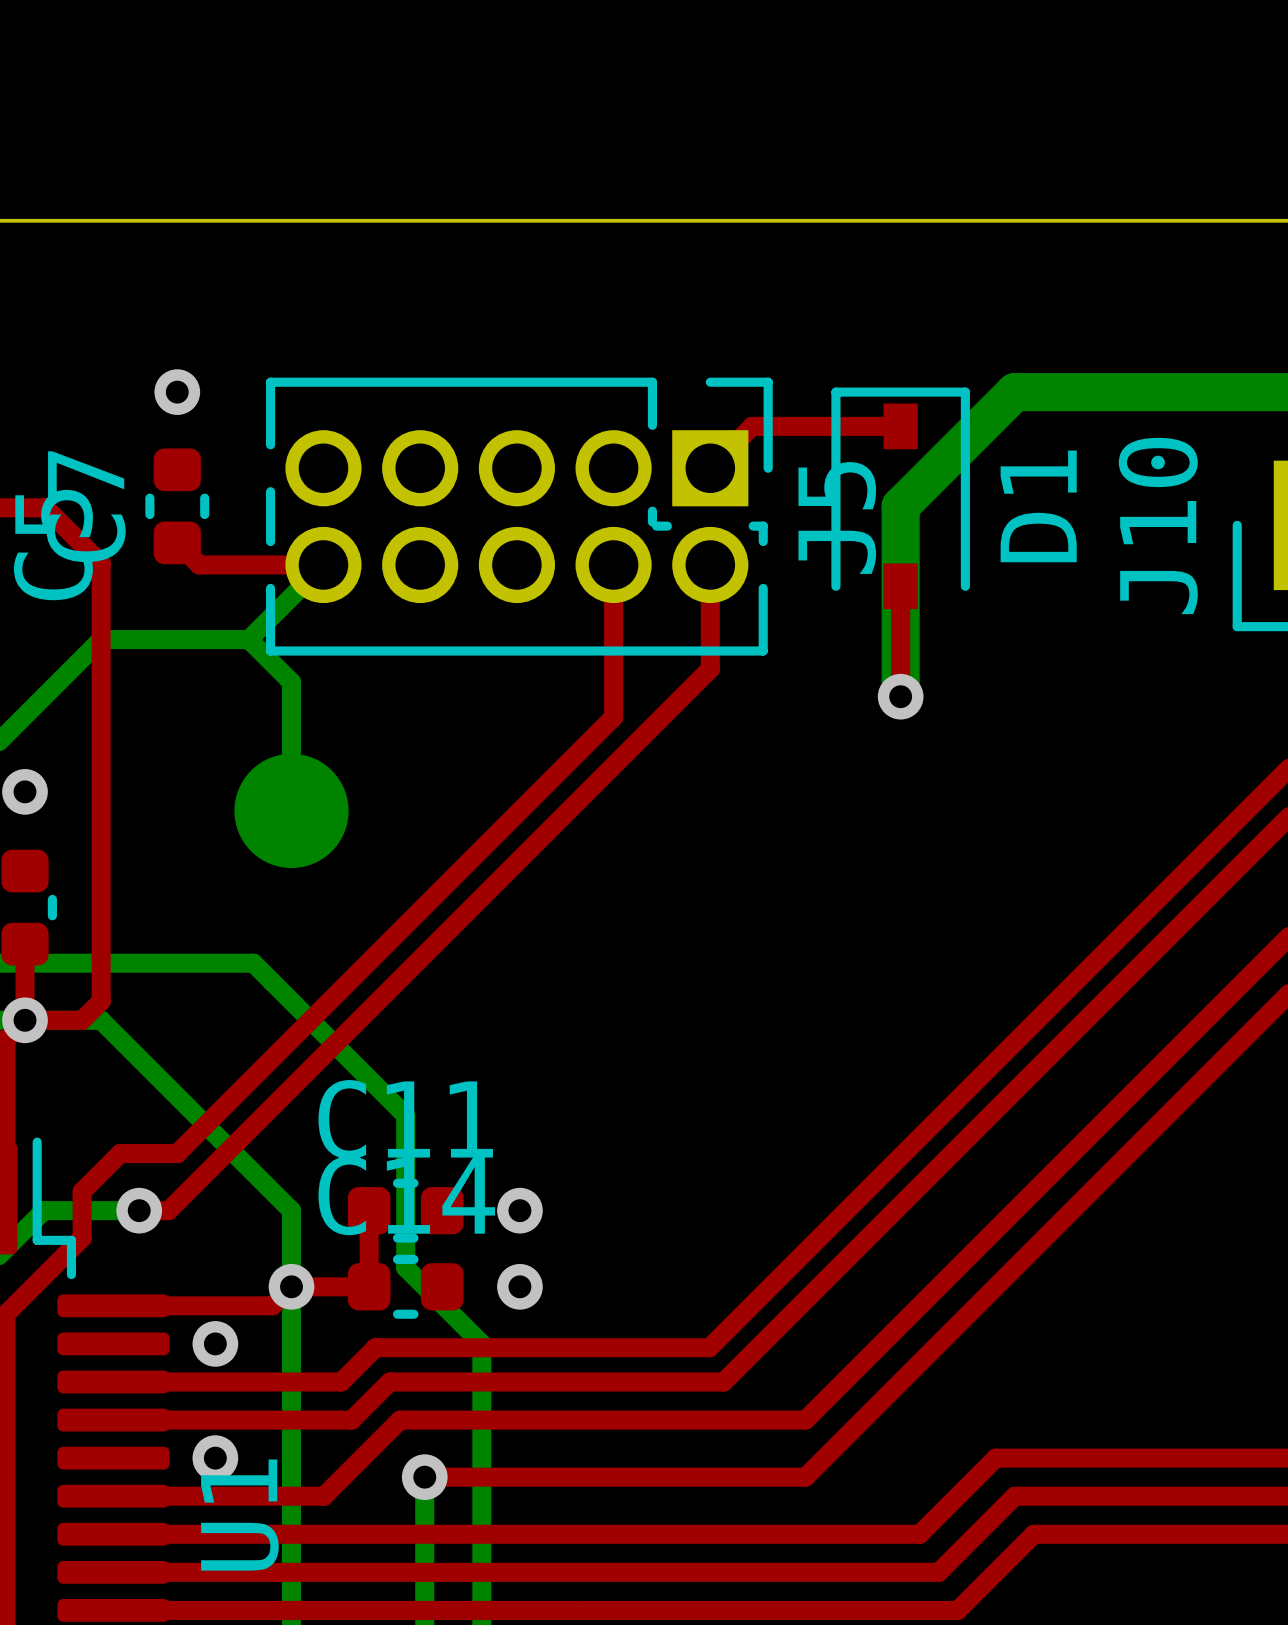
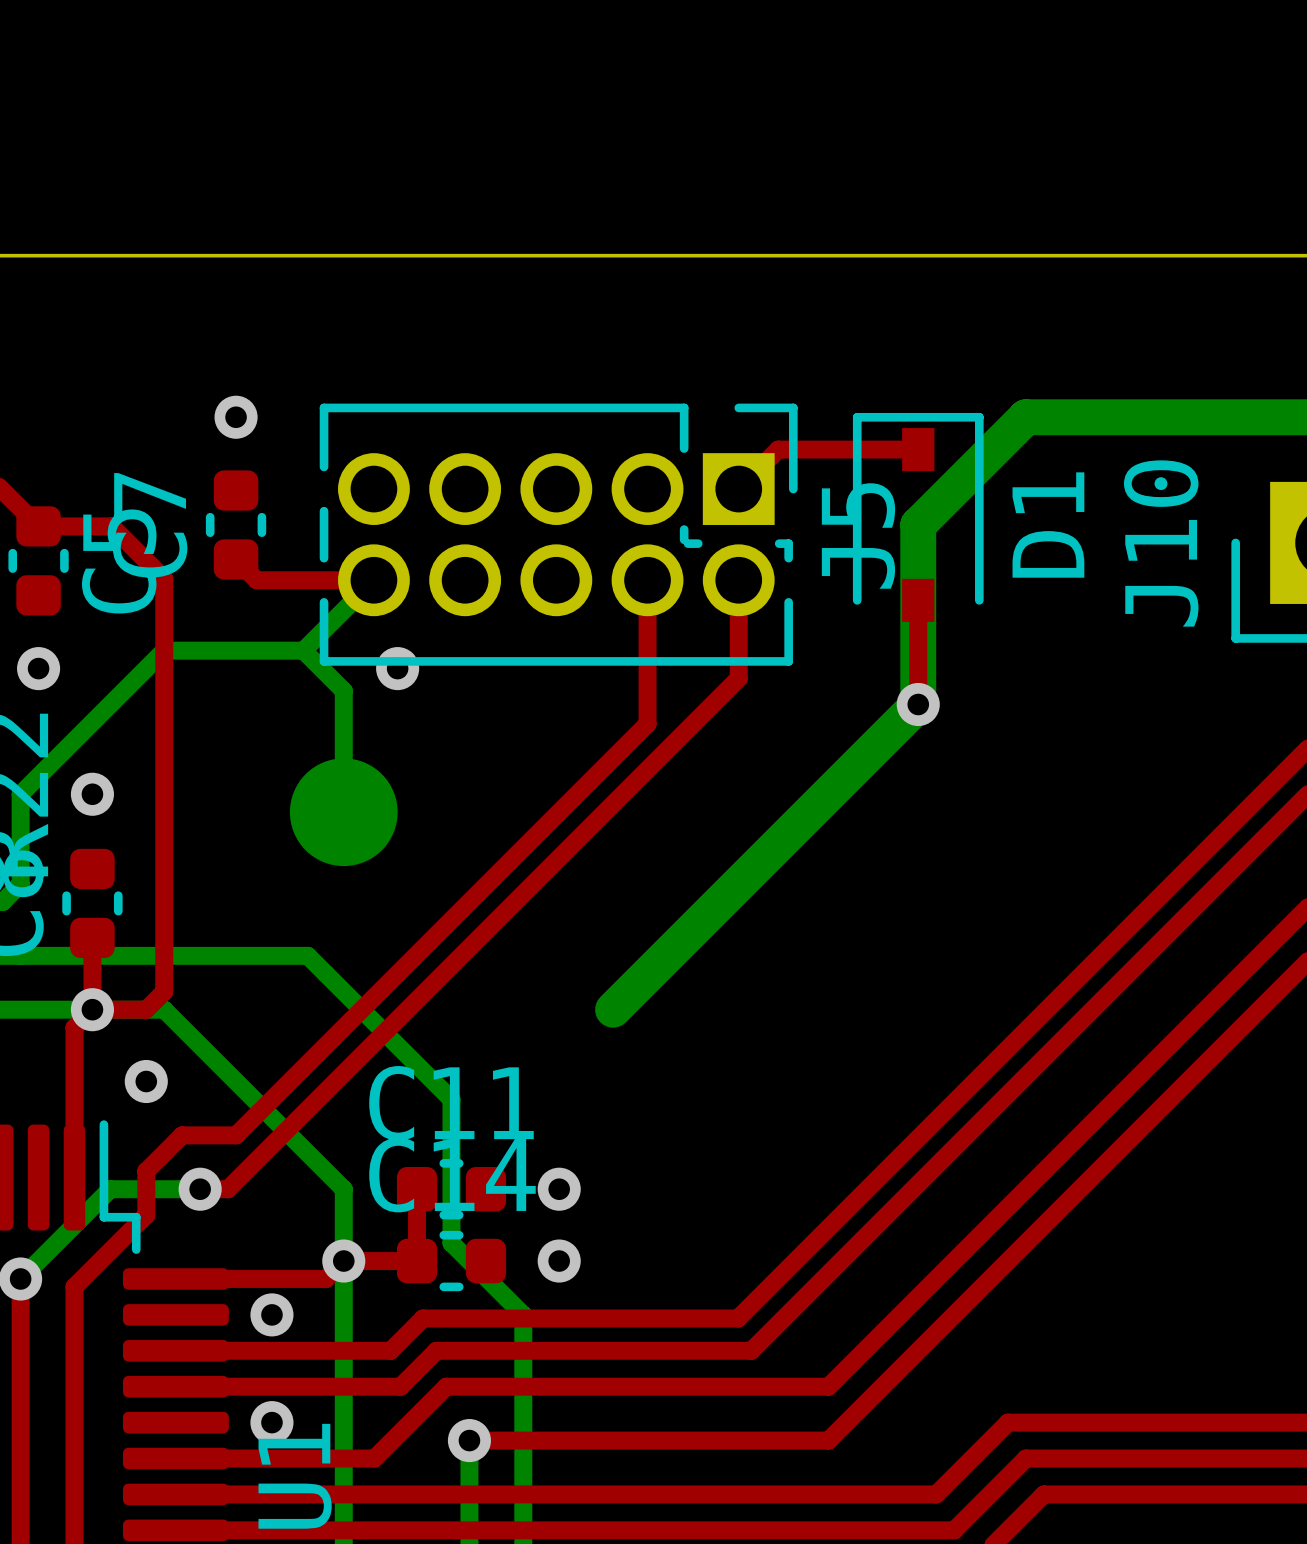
via: none -> (397, 668)
bottom track: none -> (918, 704) (613, 1009)
via: none -> (146, 1081)

